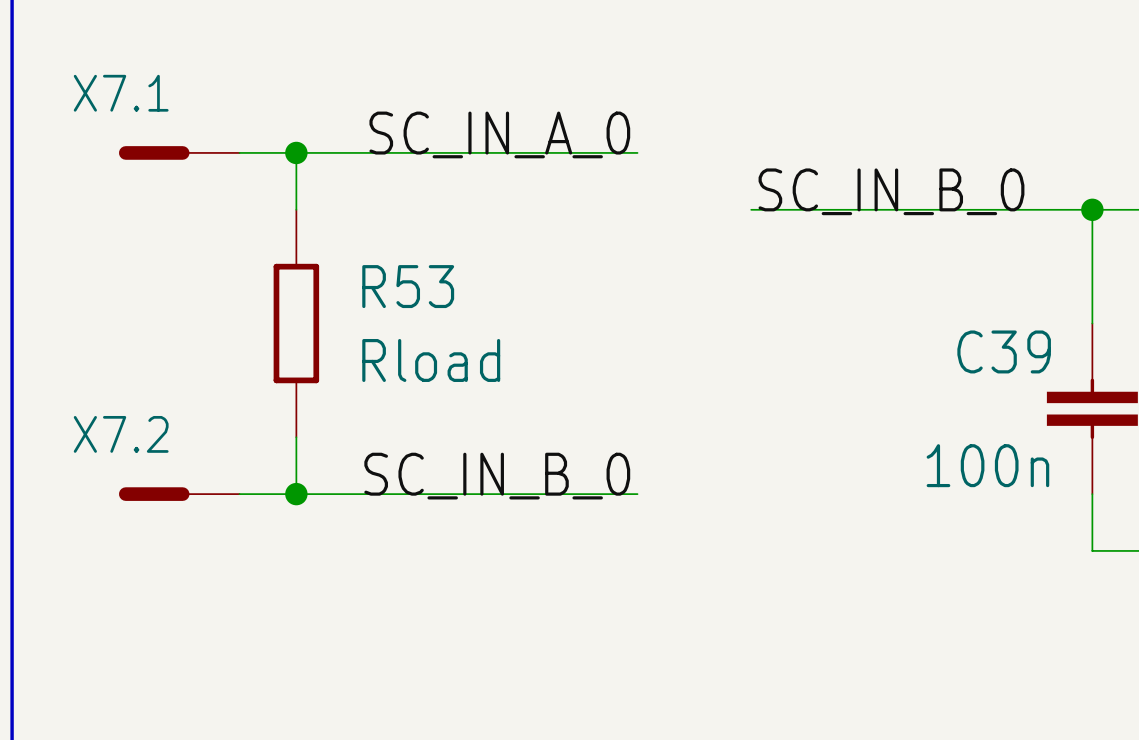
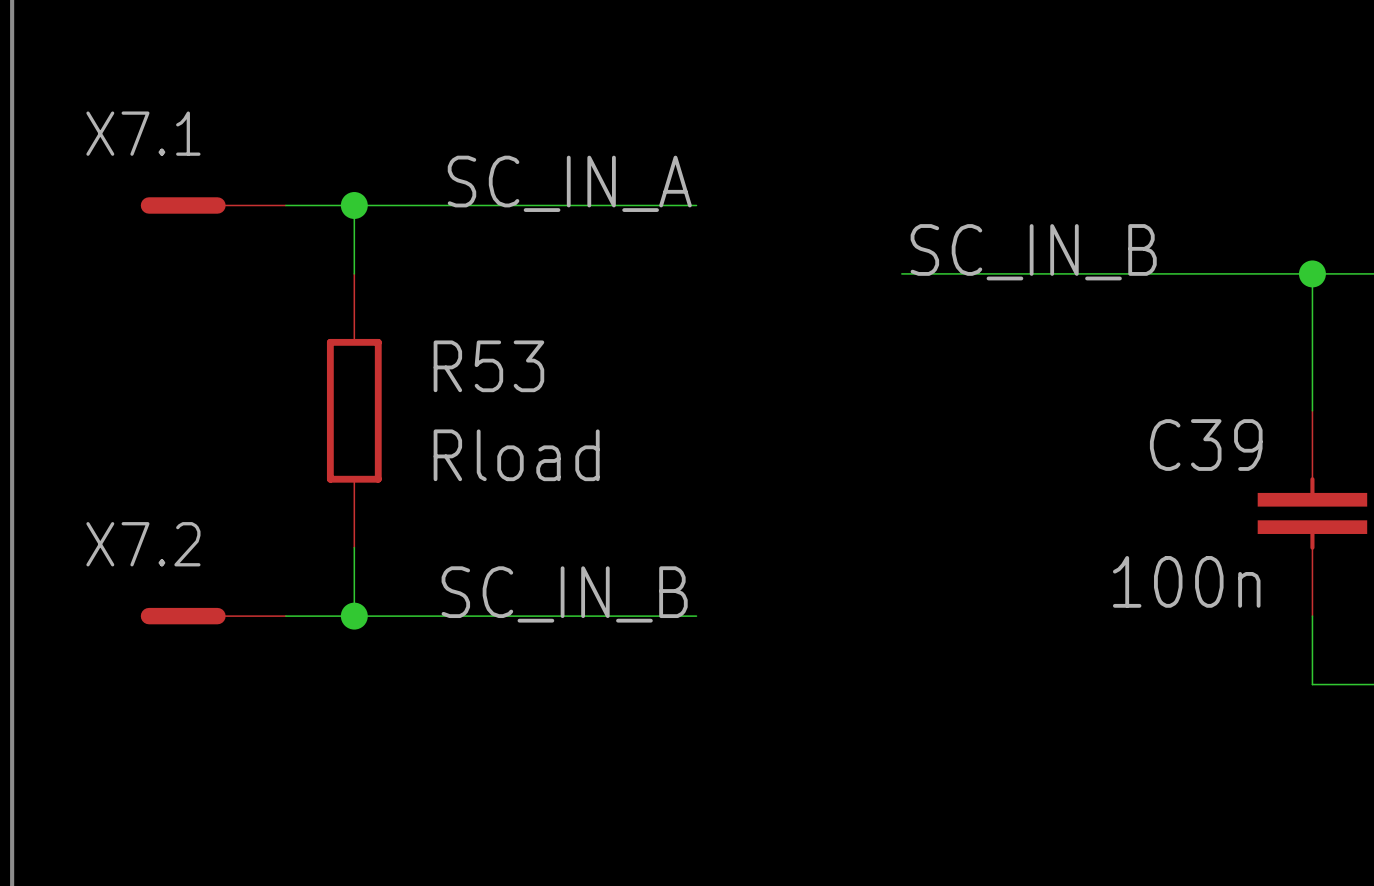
label: SC_IN_A_0 (499, 134) -> SC_IN_A (569, 183)
wire: (580, 152) (637, 152) -> none
label: SC_IN_B_0 (891, 191) -> SC_IN_B (1033, 252)
label: SC_IN_B_0 (497, 476) -> SC_IN_B (564, 594)
wire: (580, 494) (637, 494) -> none

